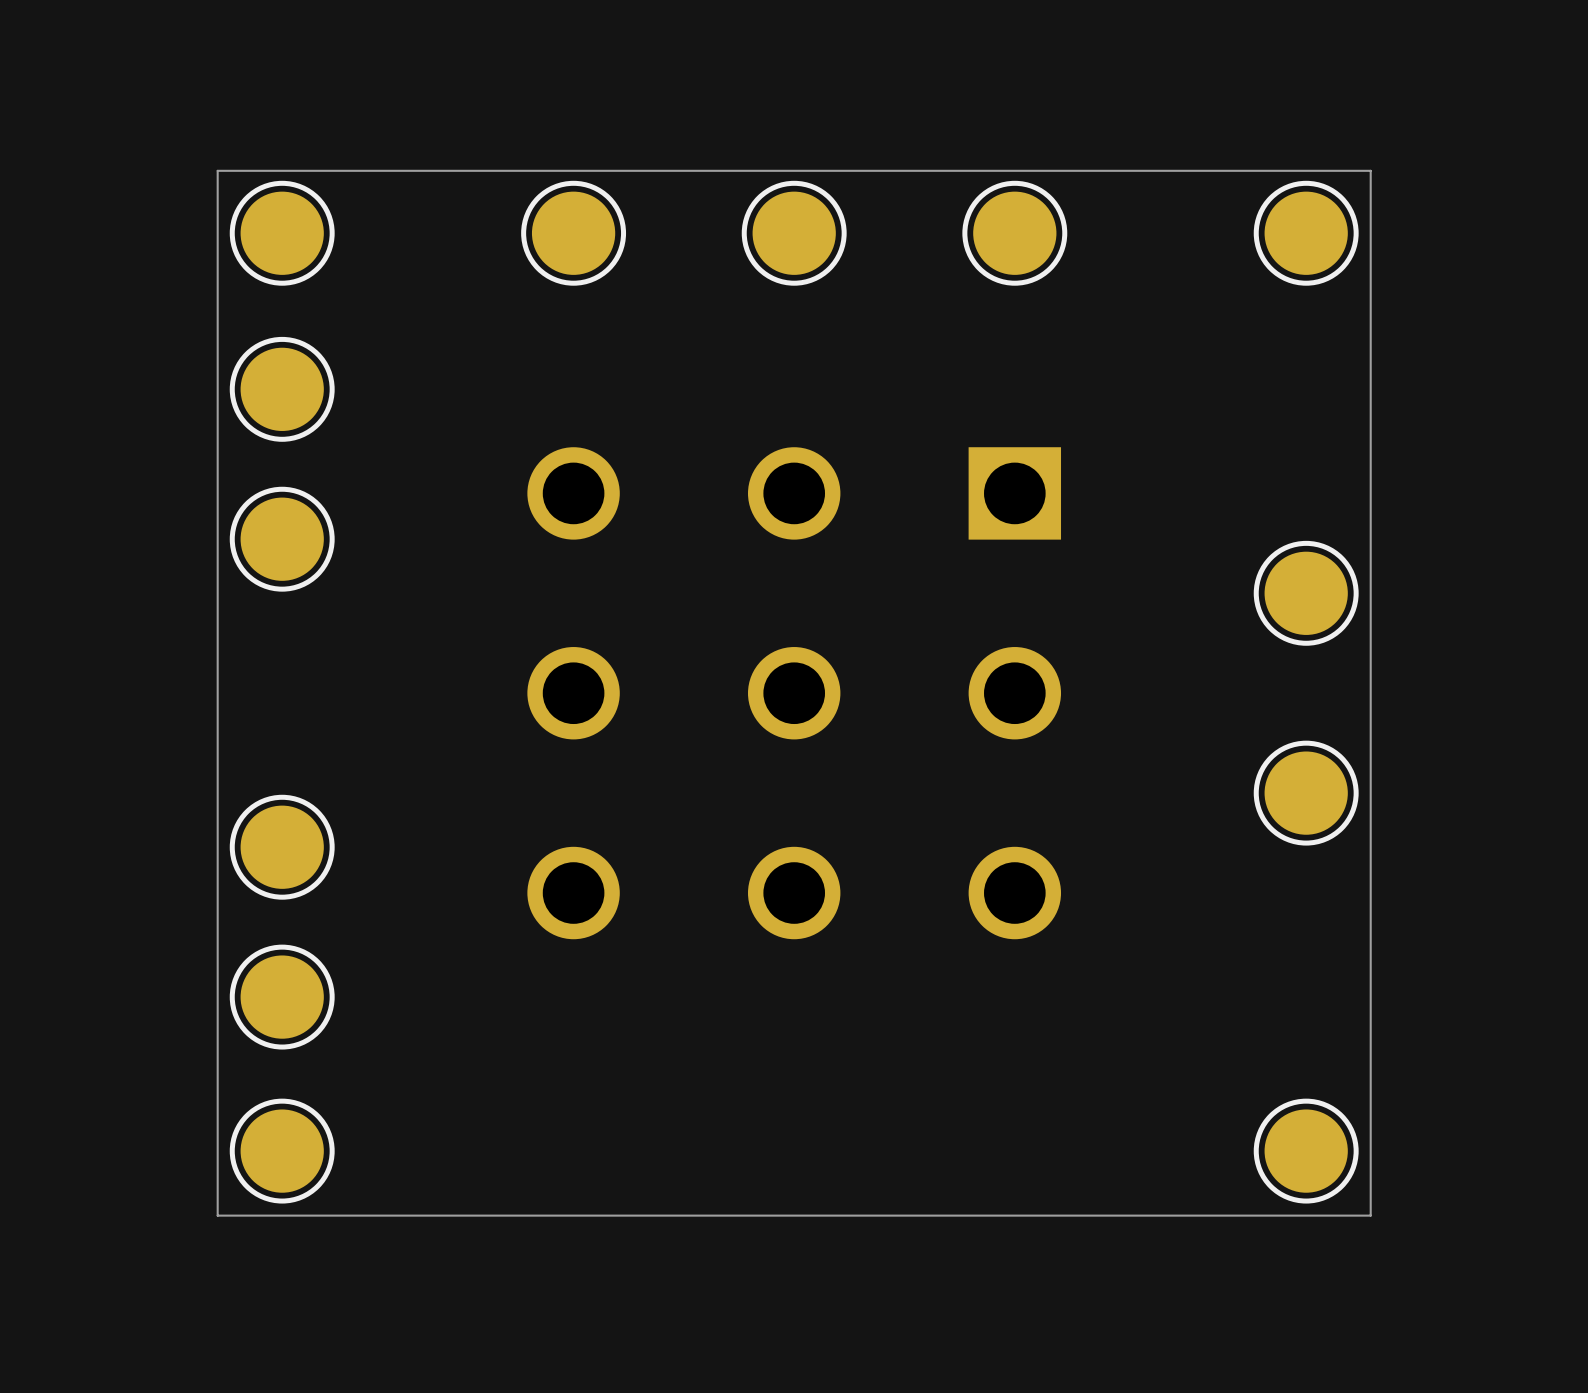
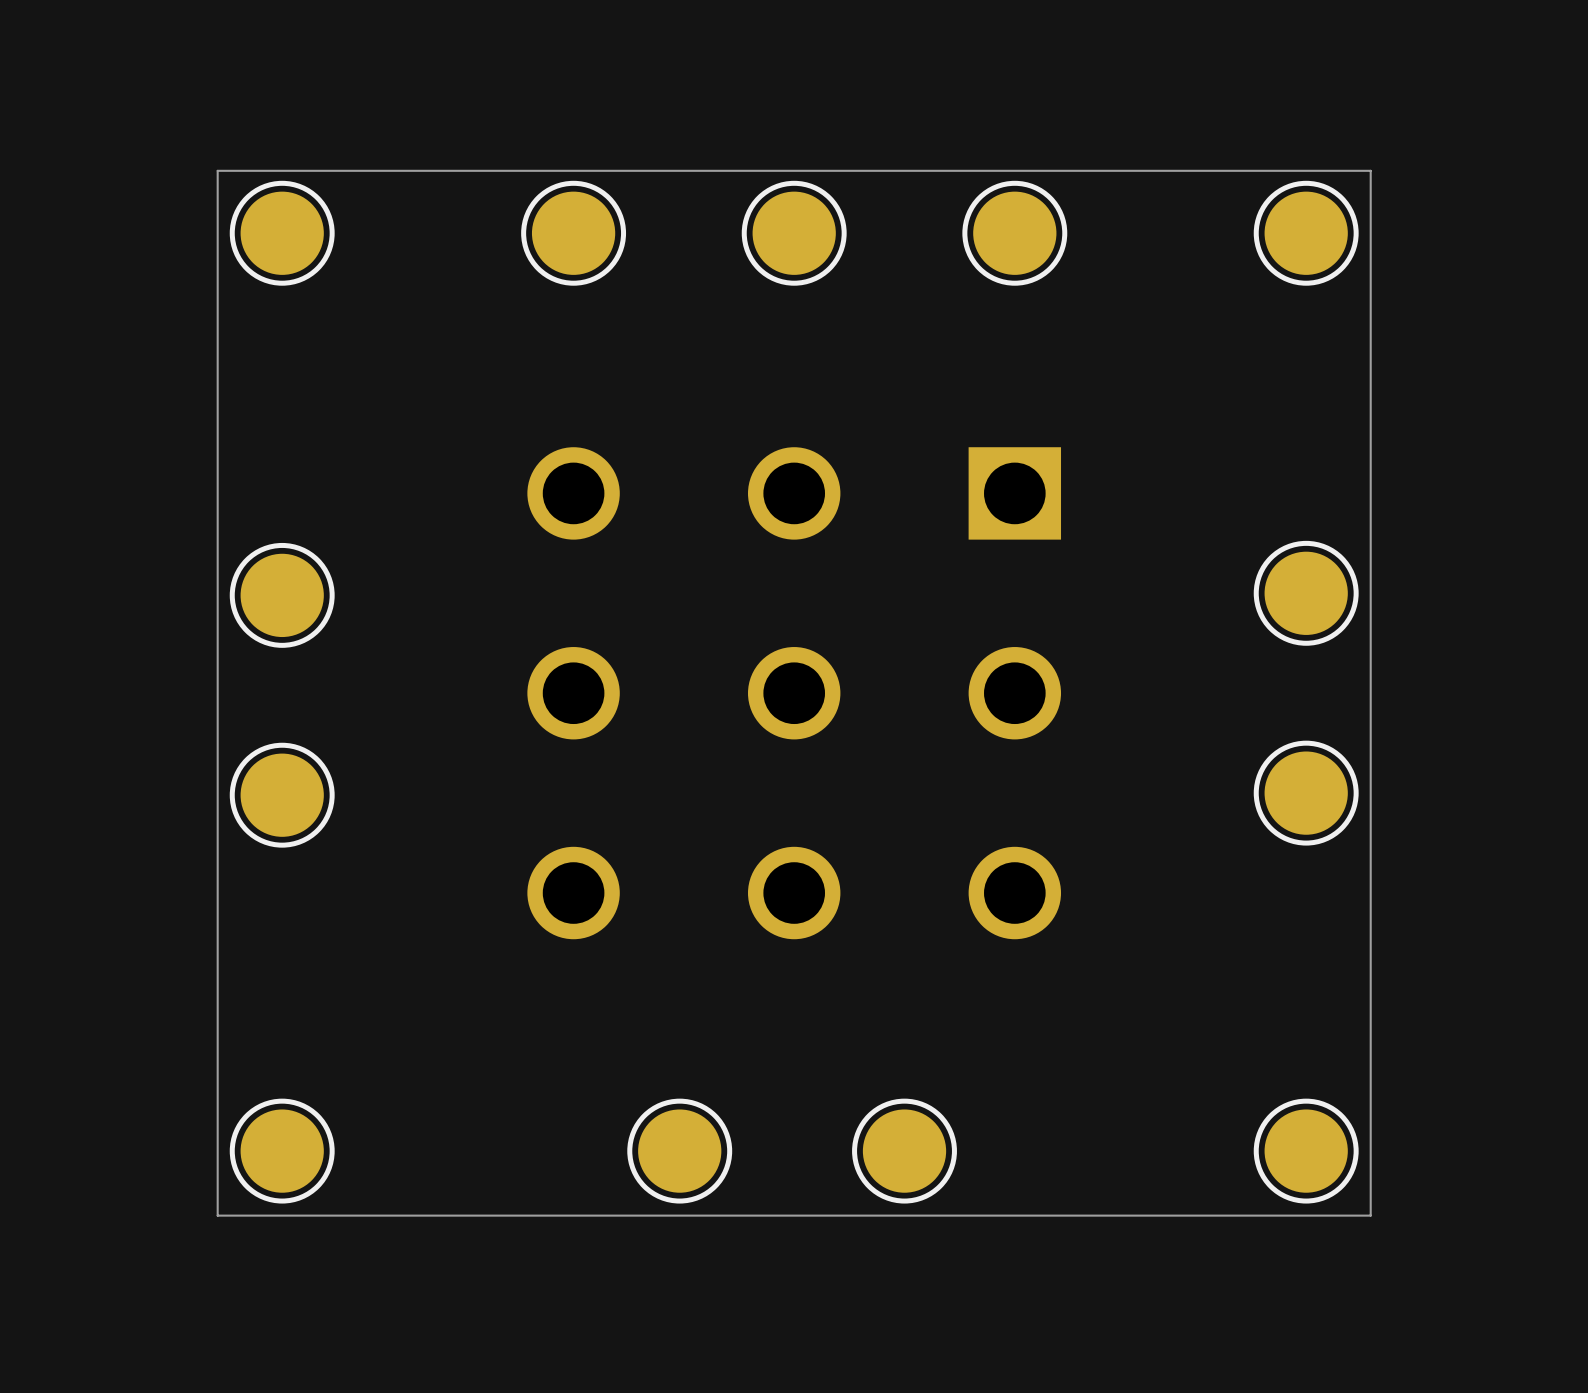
part: (282, 389) -> none
part position: (282, 539) -> (282, 595)
part position: (282, 847) -> (282, 795)
part: (282, 997) -> none
part: none -> (679, 1151)
part: none -> (904, 1151)

